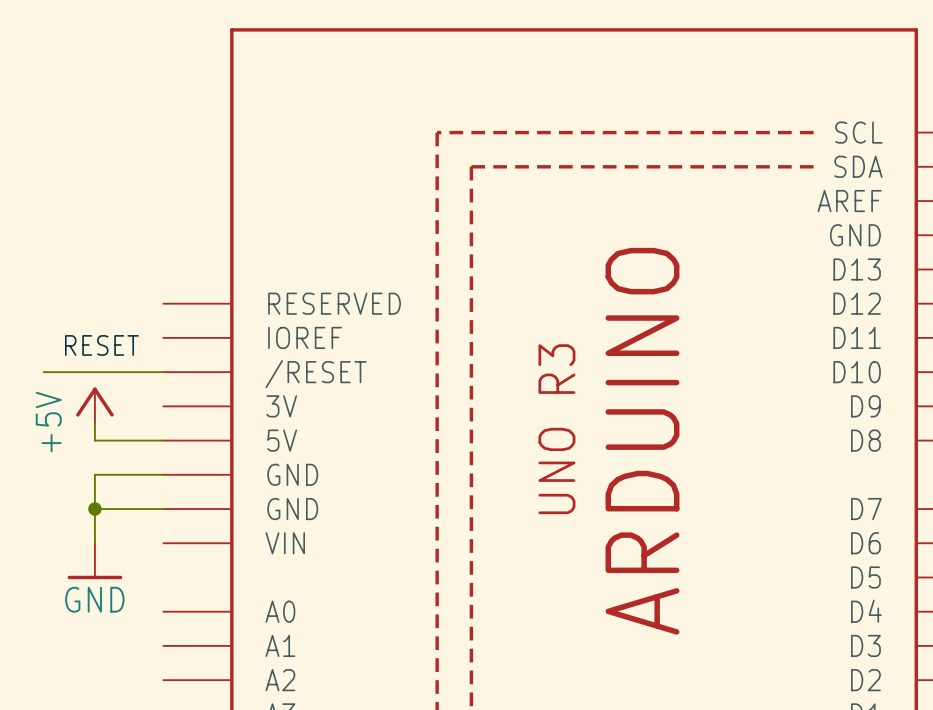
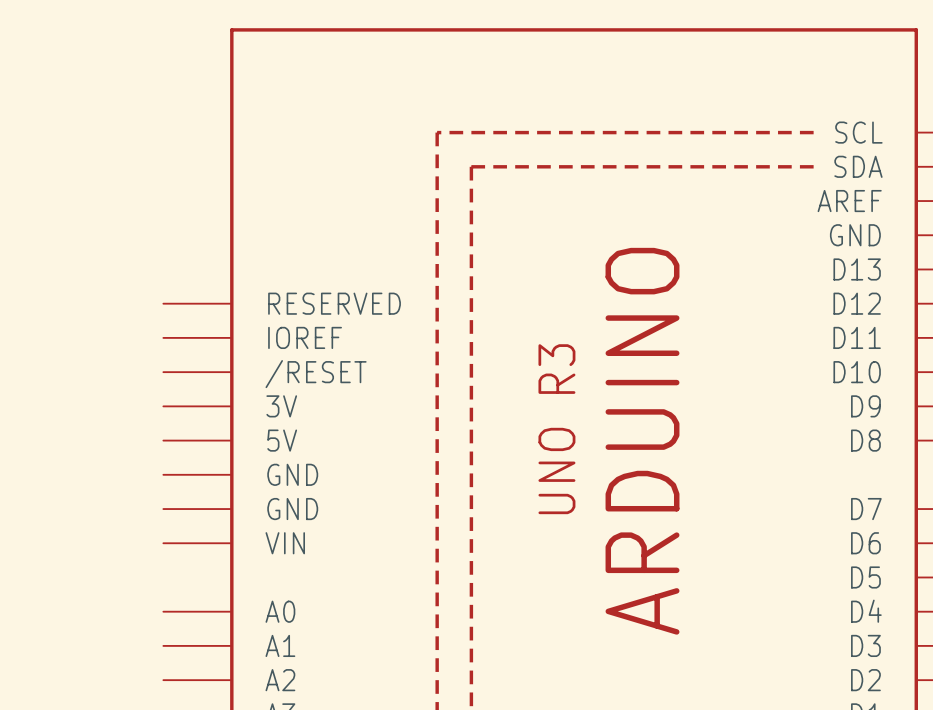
label: RESET (101, 345) -> none
wire: (43, 372) (163, 372) -> none
power symbol: +5V (94, 405) -> none
wire: (94, 423) (94, 440) (163, 440) -> none
wire: (163, 474) (94, 474) (94, 543) -> none
wire: (94, 509) (163, 509) -> none
junction: (94, 509) -> none
power symbol: GND (94, 561) -> none

